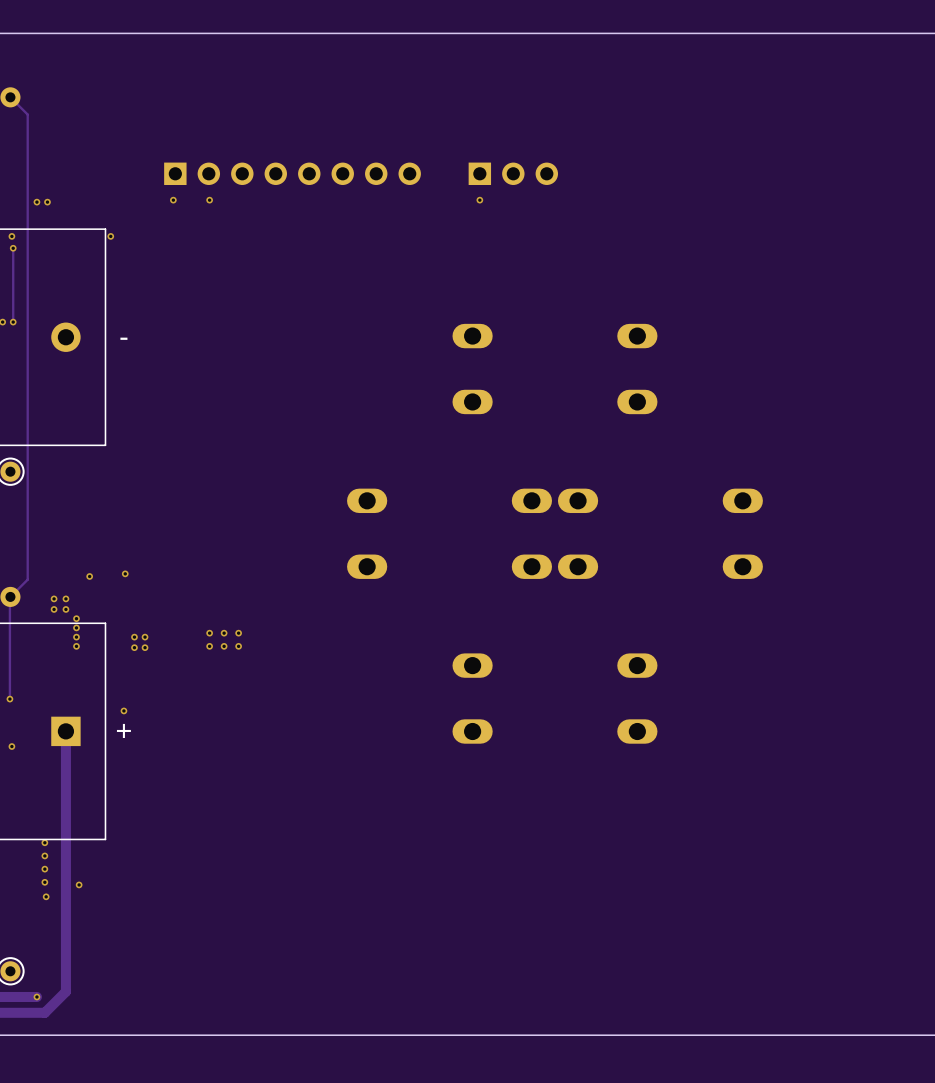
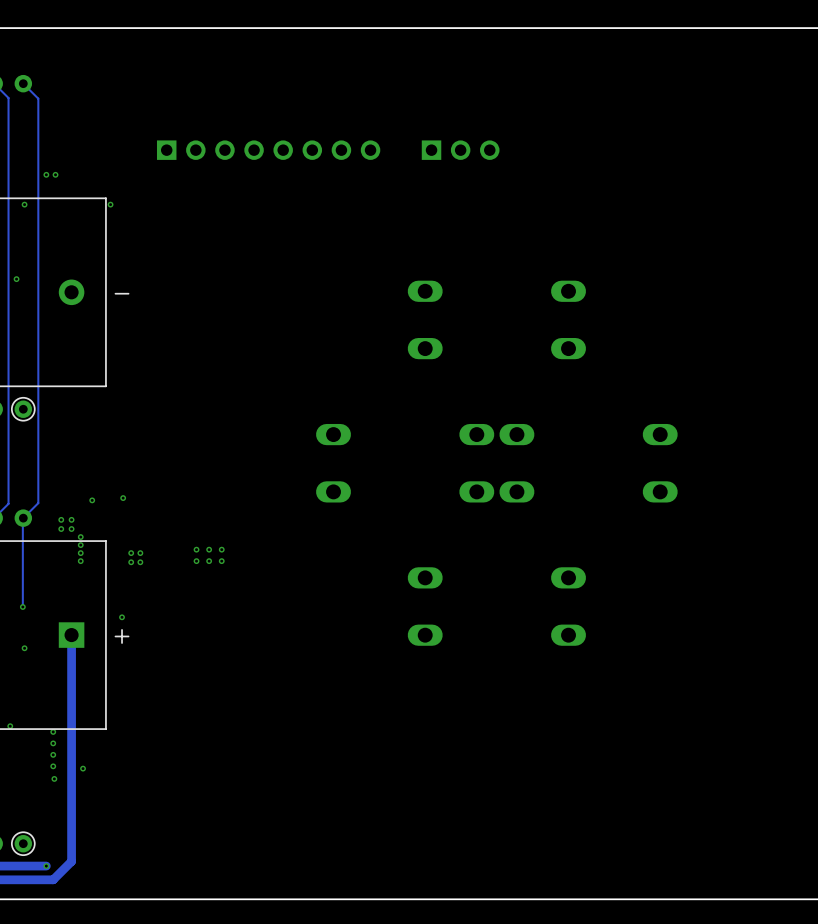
via: (173, 200) -> none
via: (209, 200) -> none
via: (479, 200) -> none
track: (13, 248) (13, 322) -> none
via: (13, 248) -> none
via: (13, 322) -> none

